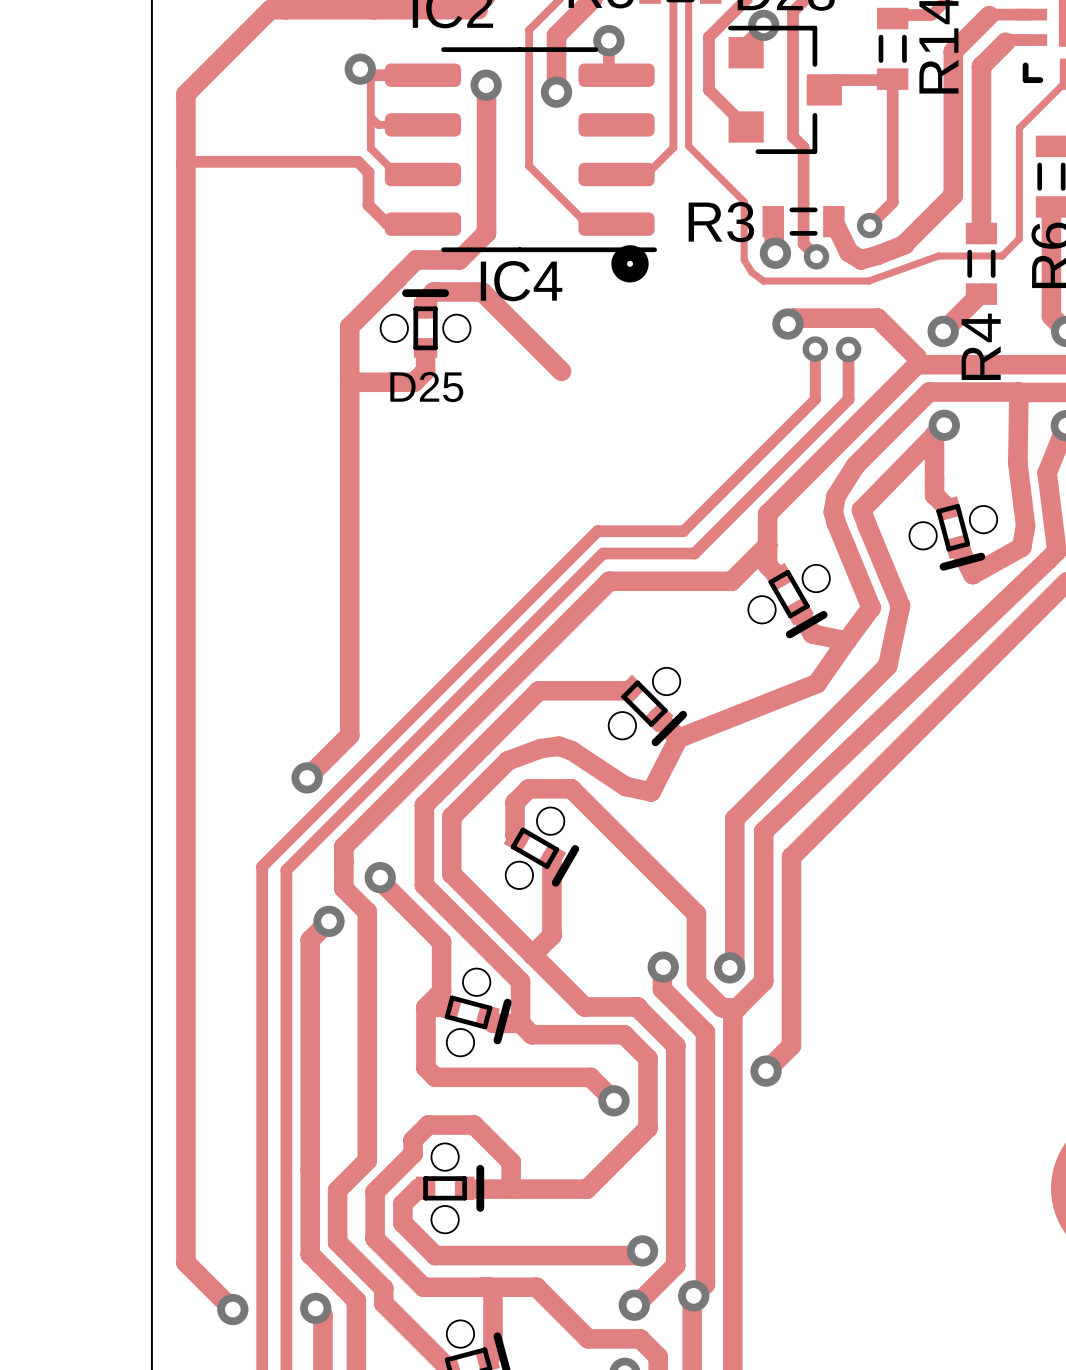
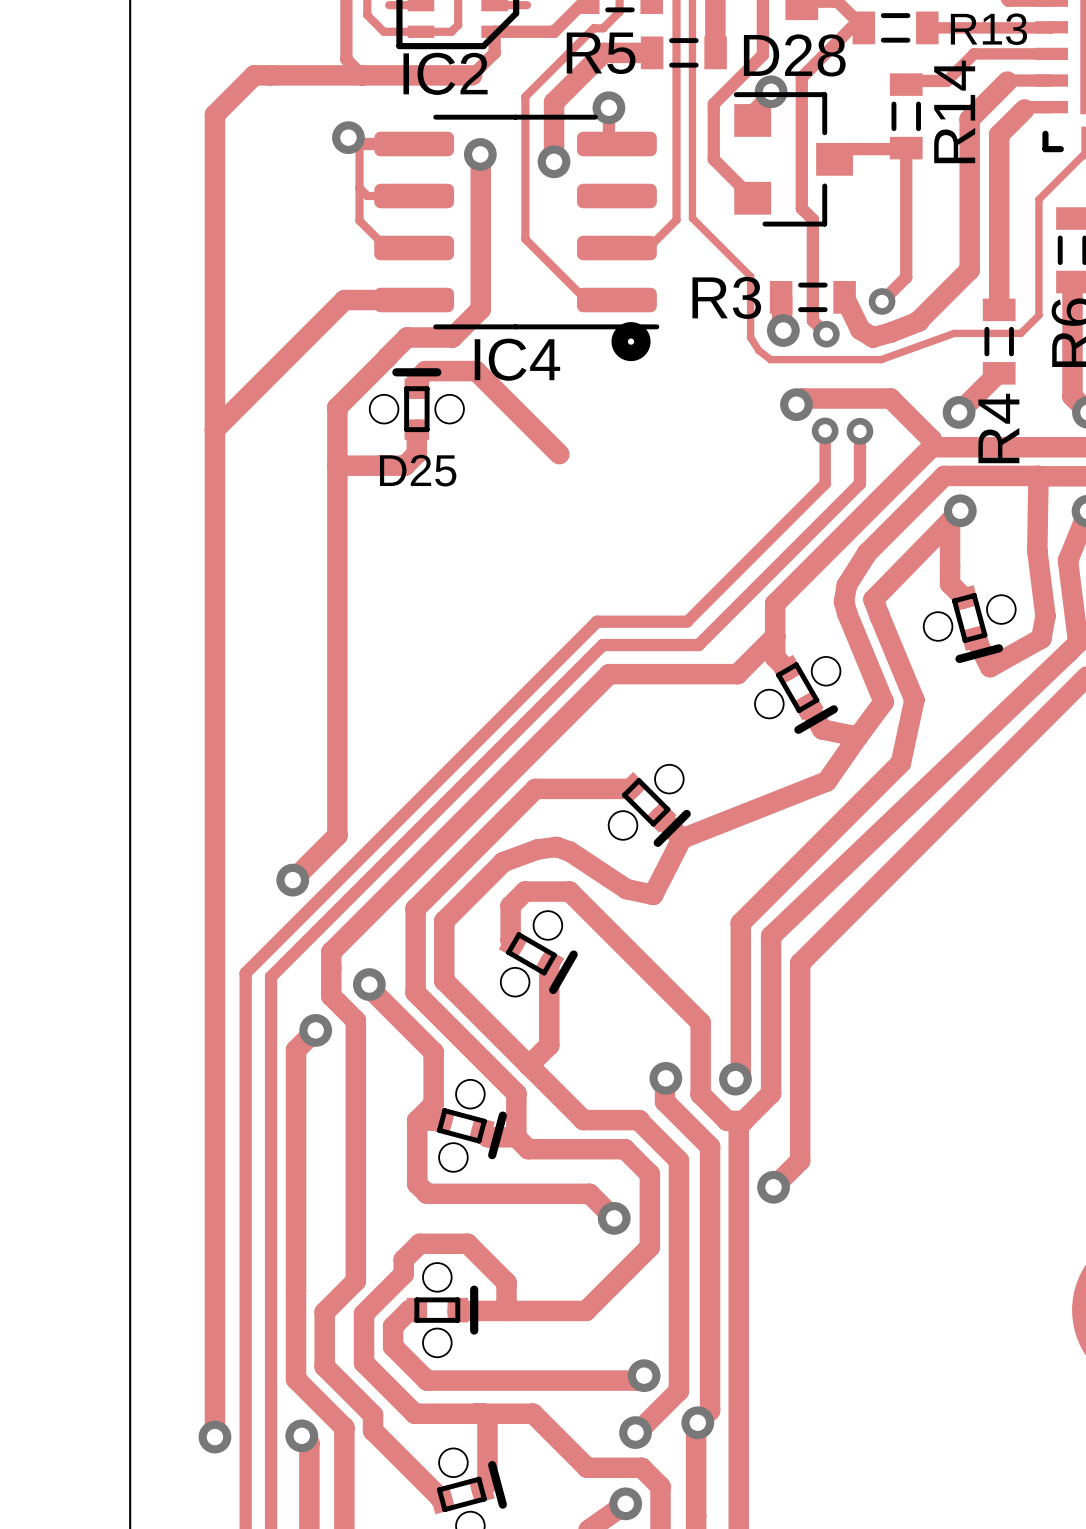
track: (232, 47) (185, 94) (185, 1262) (232, 1309) -> (214, 114) (214, 1437)
track: (185, 164) (188, 161) (357, 161) (368, 172) (368, 205) (387, 224) -> (214, 429) (344, 300) (376, 300)

